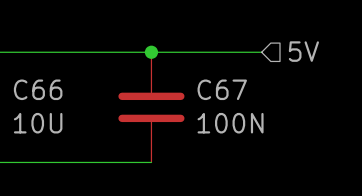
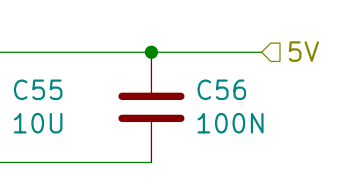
C66 name: C66 (38, 89) -> C55 (38, 89)
C67 name: C67 (222, 89) -> C56 (221, 89)

